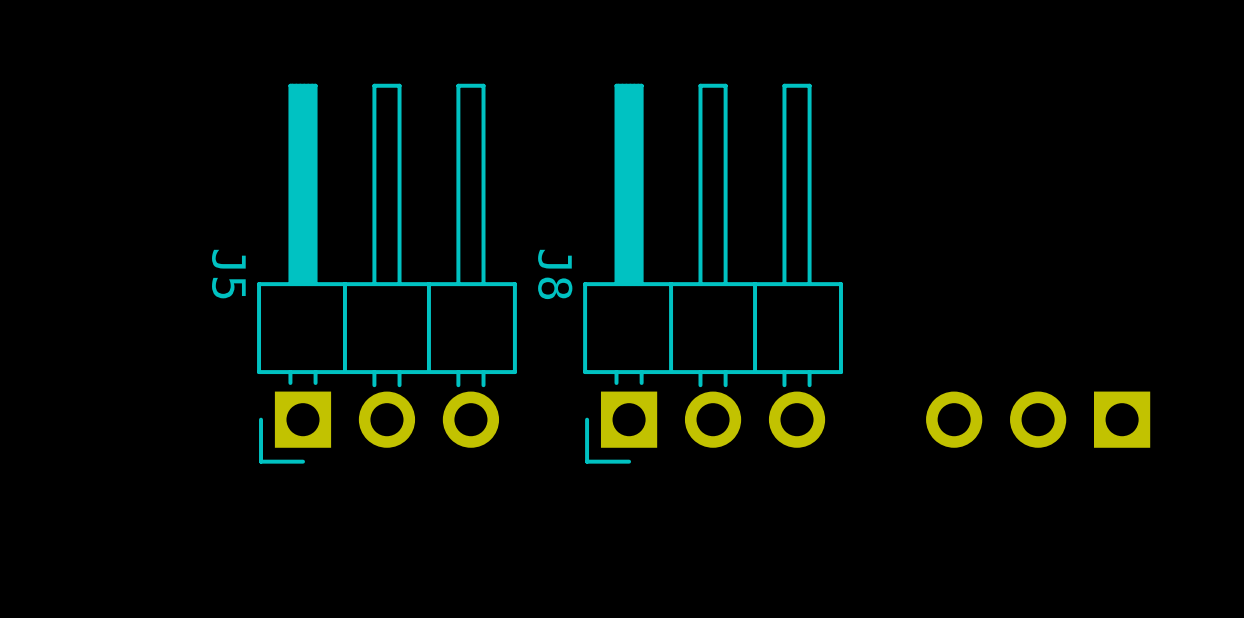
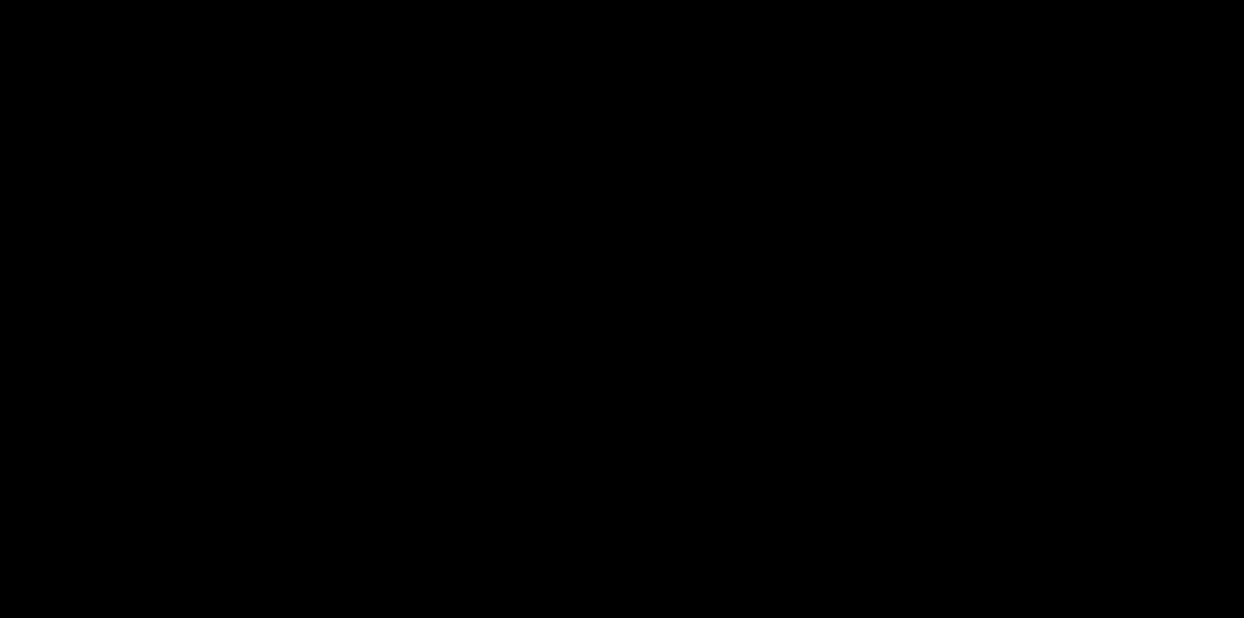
J5: (386, 273) -> none
J8: (713, 273) -> none
part: (1038, 419) -> none

